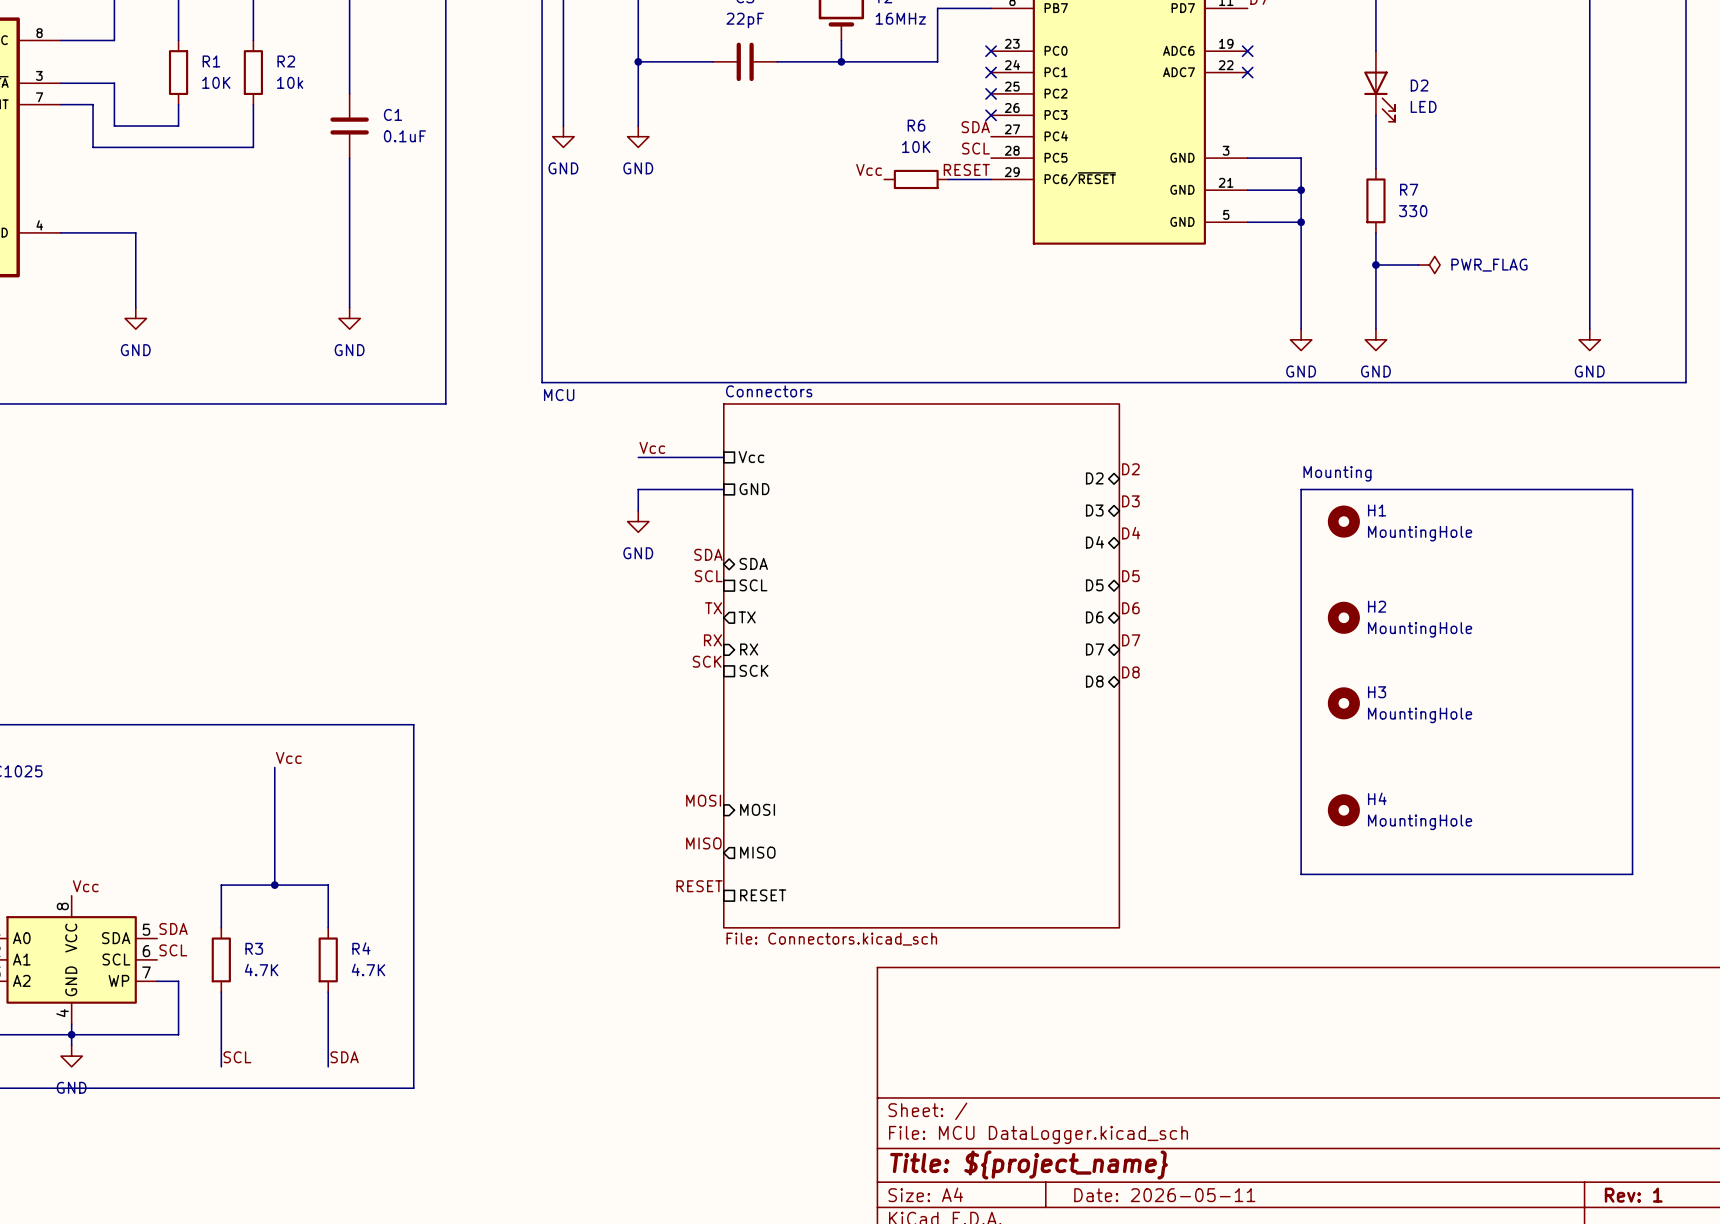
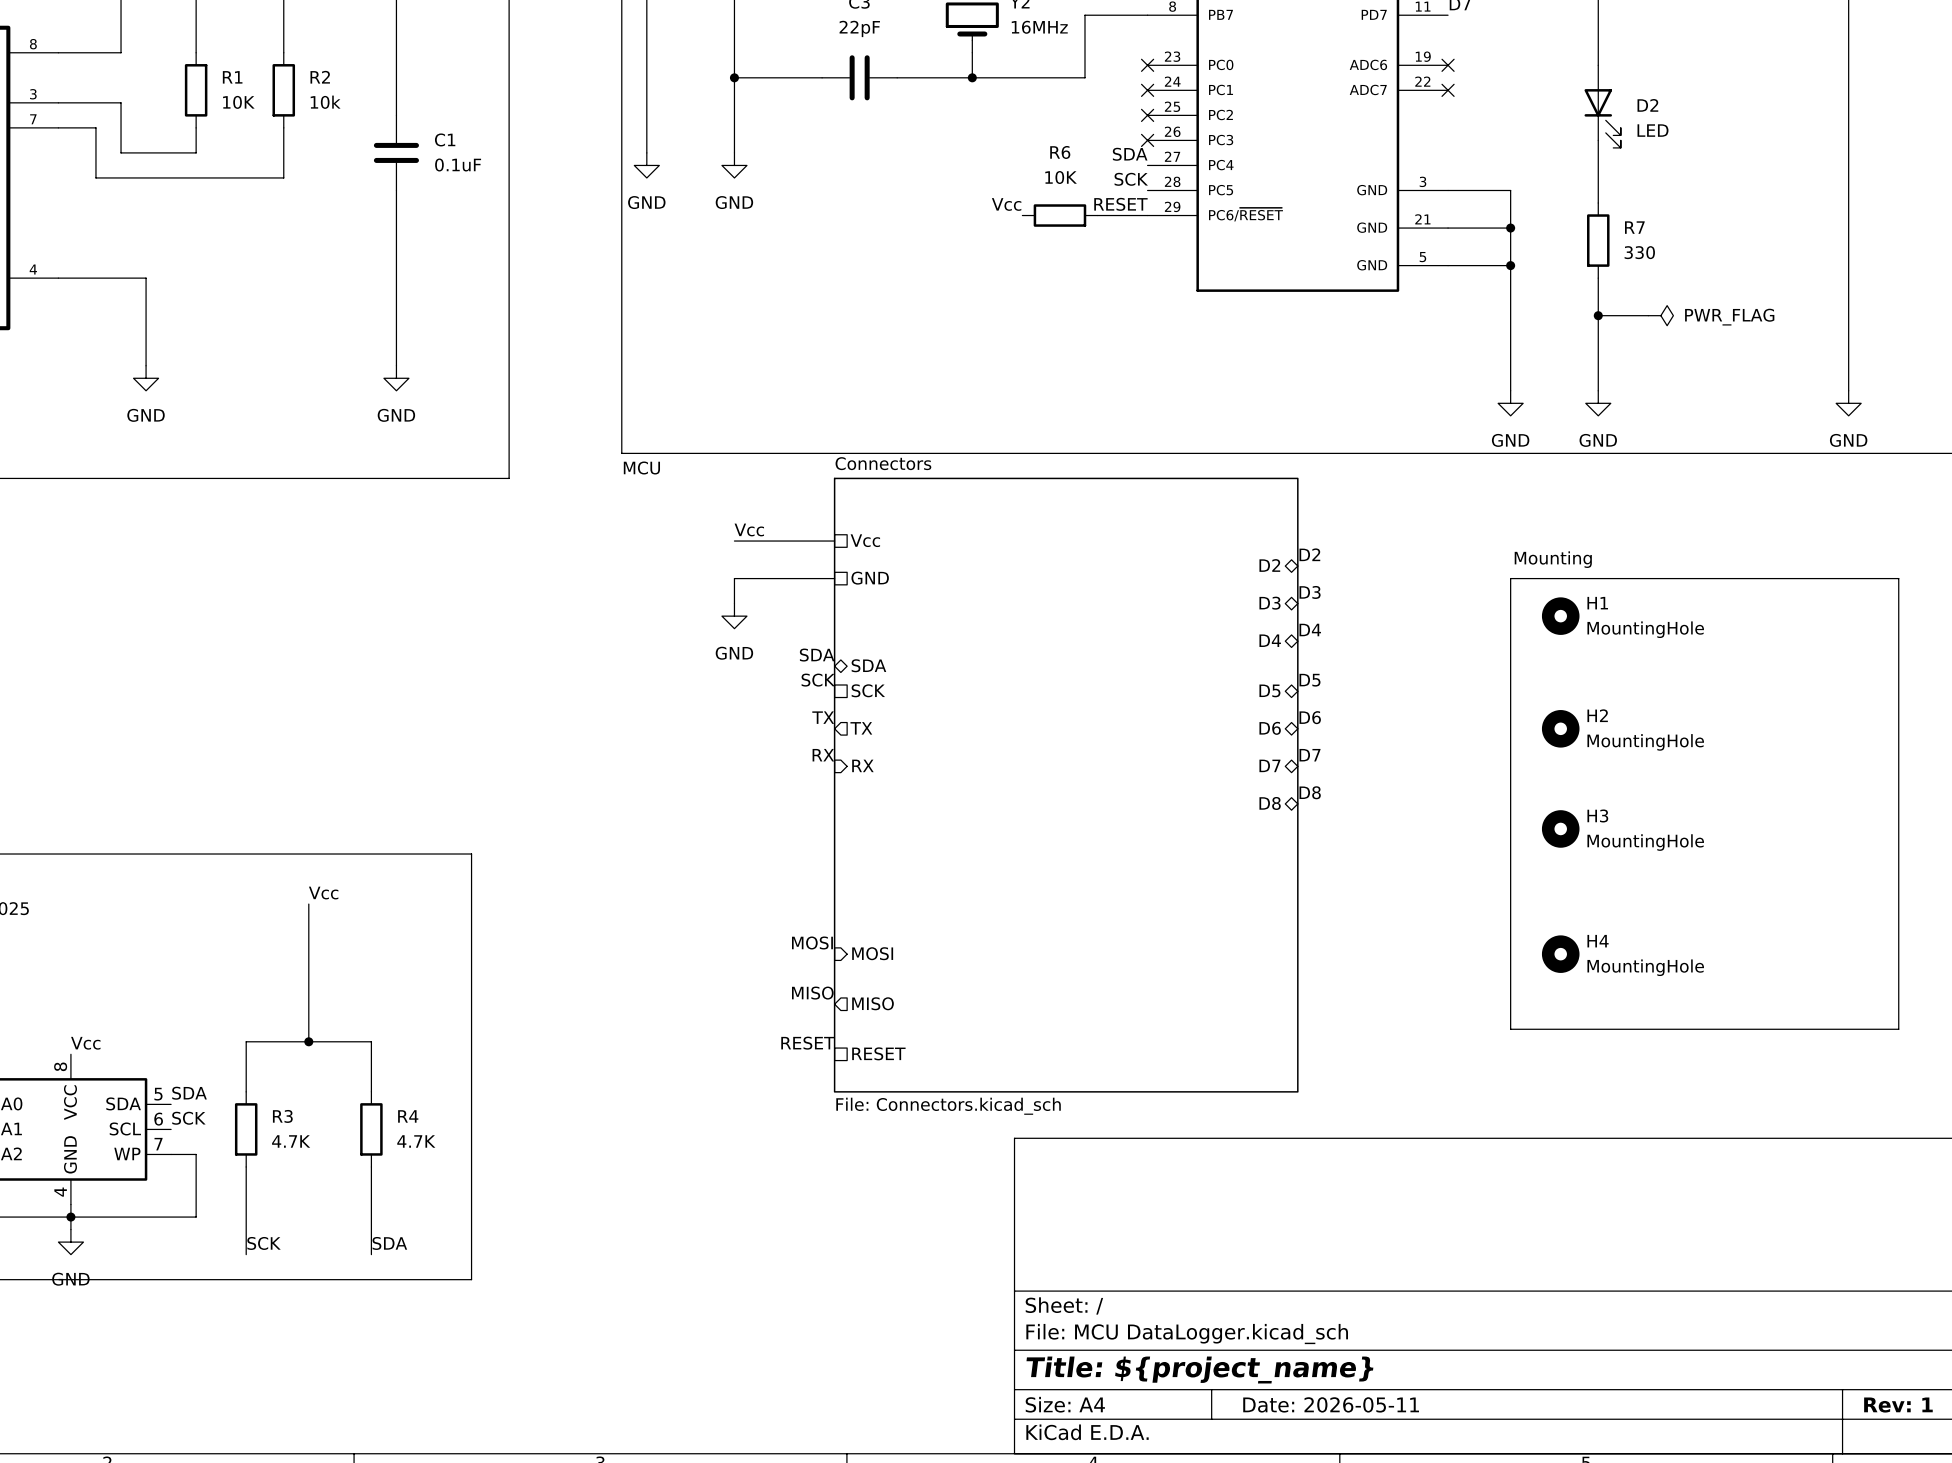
label: SCL (975, 148) -> SCK (1131, 179)
label: SCL (708, 576) -> SCK (818, 680)
sheet pin: SCL (753, 585) -> SCK (868, 690)
label: SCK (707, 661) -> none
sheet pin: SCK (754, 670) -> none
label: SCL (173, 950) -> SCK (188, 1118)
label: SCL (237, 1057) -> SCK (264, 1243)

